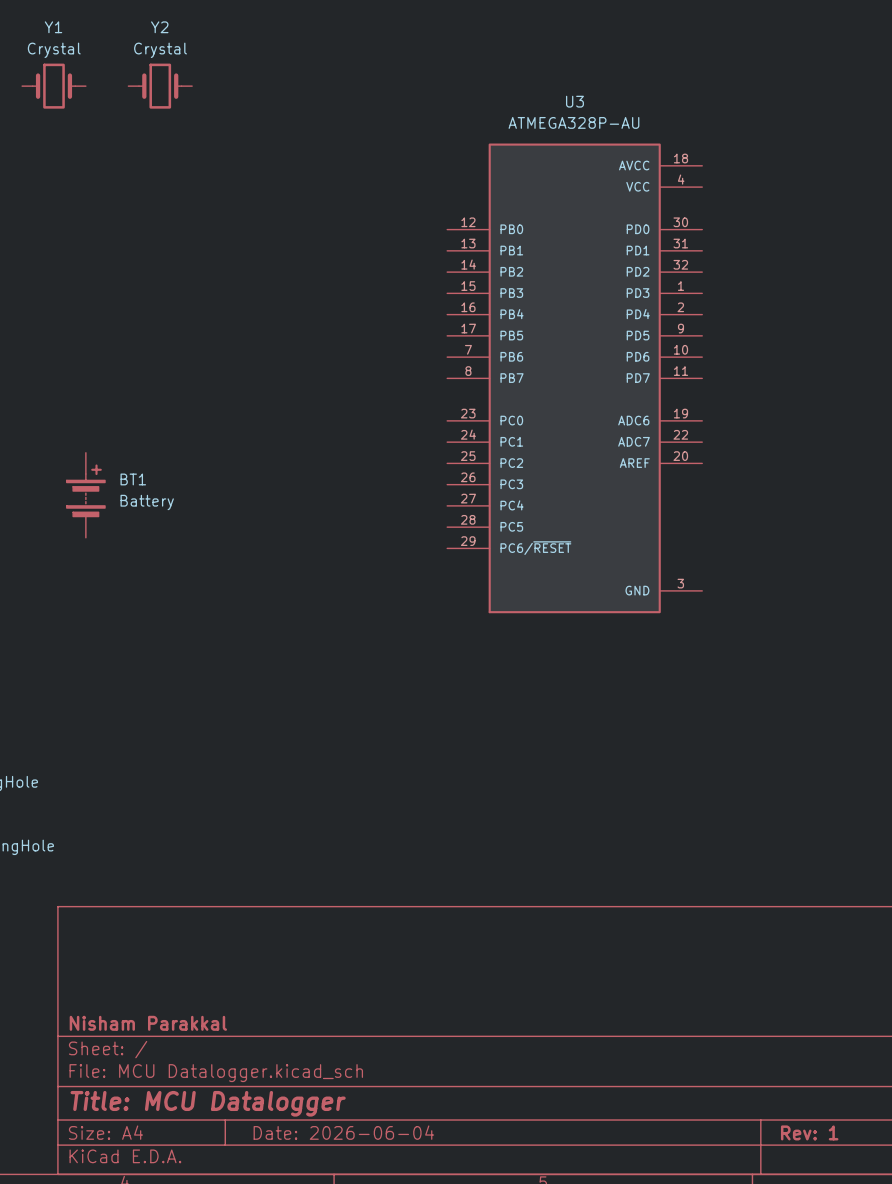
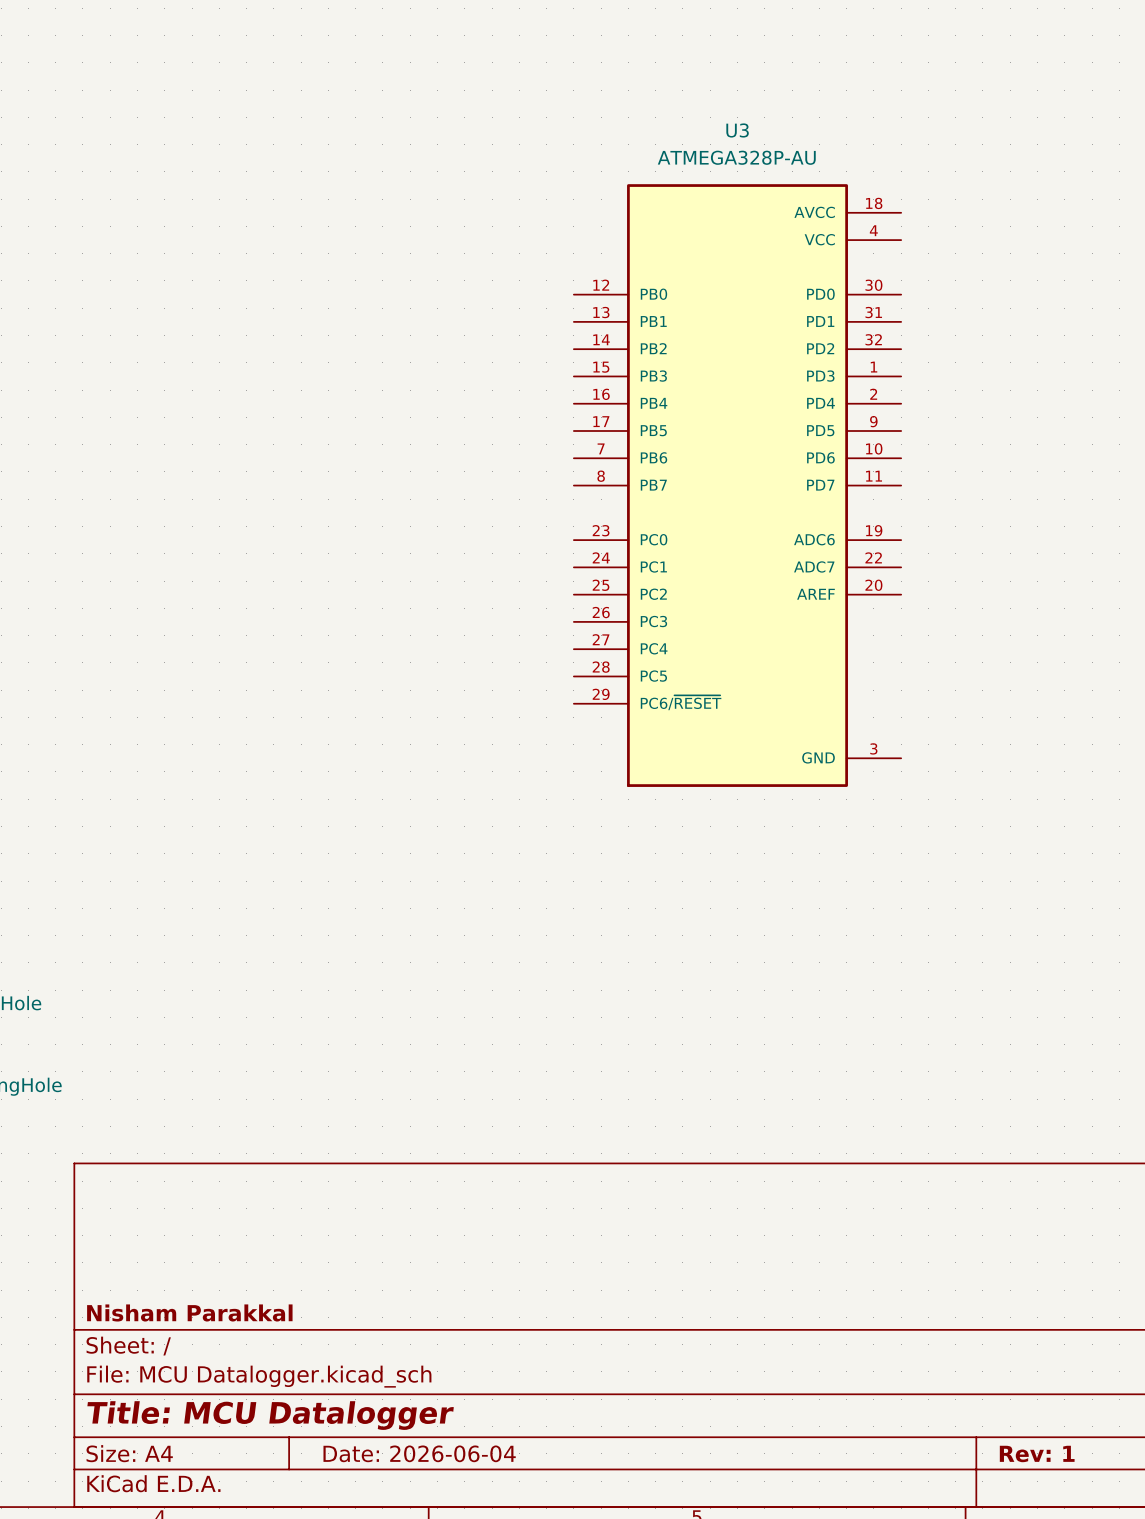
Y1: Crystal (53, 86) -> none
Y2: Crystal (160, 86) -> none
BT1: Battery (85, 495) -> none

